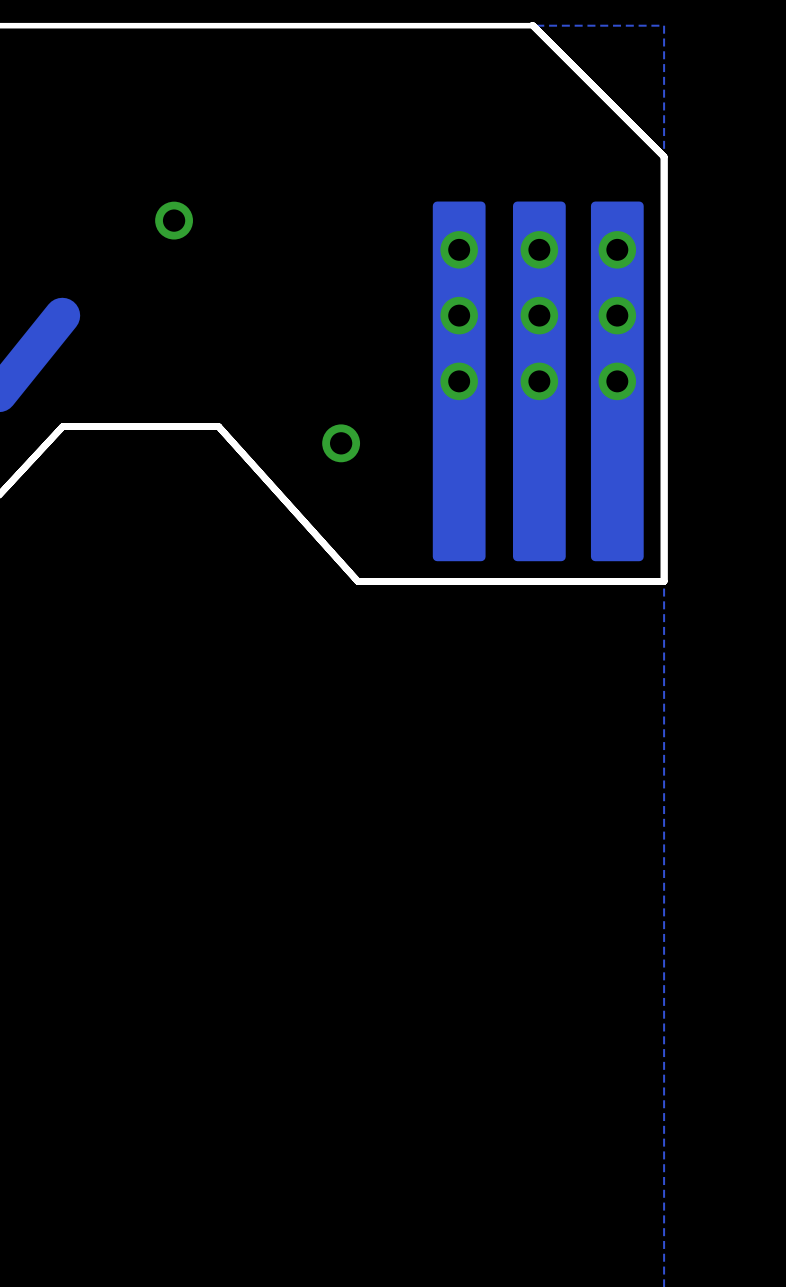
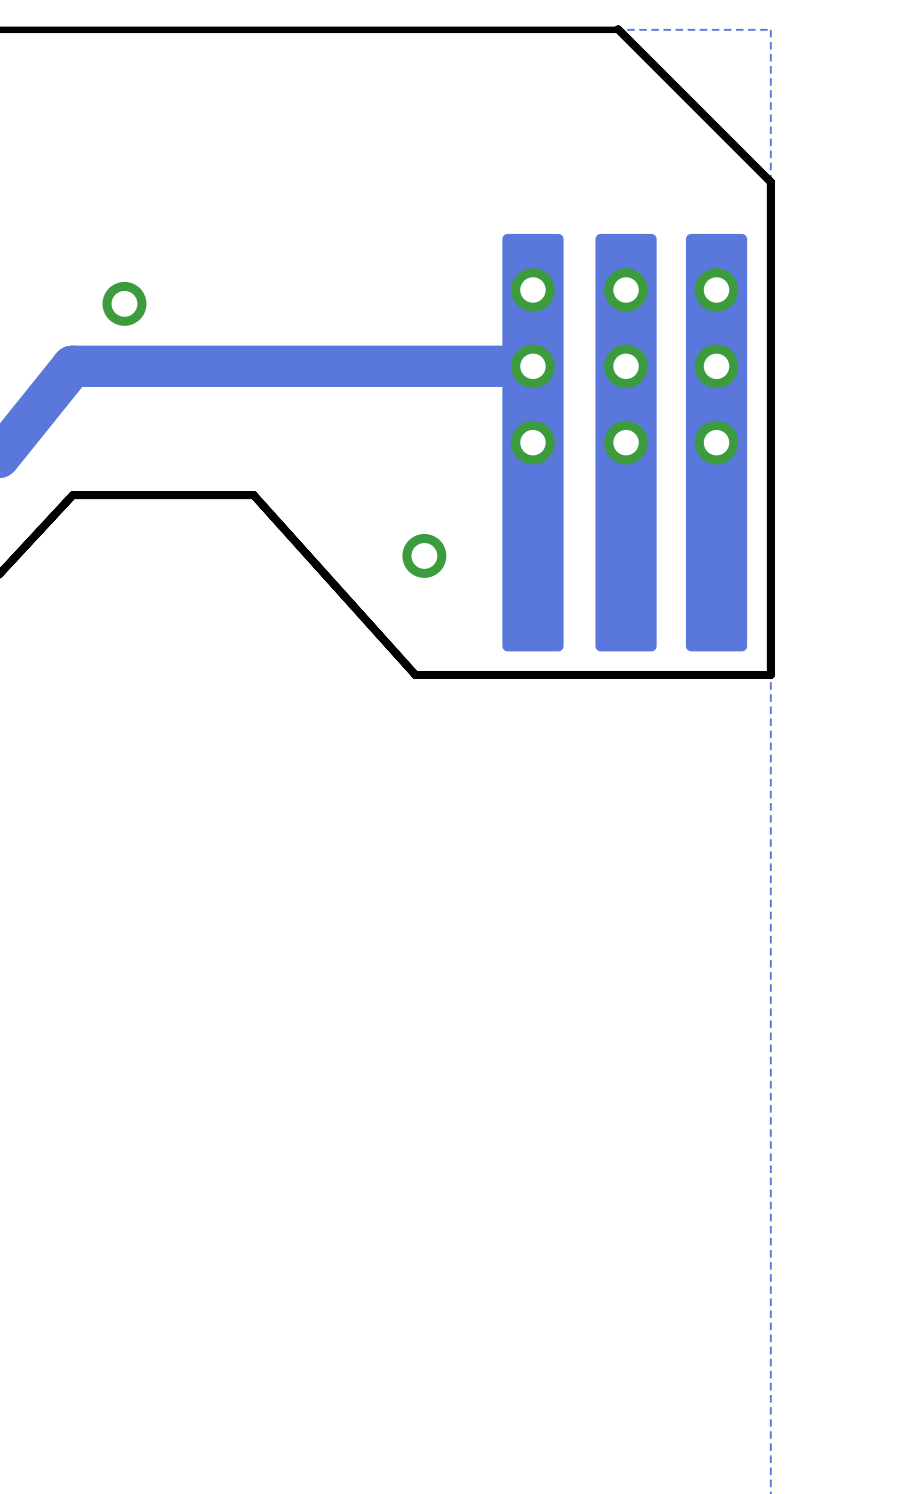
via position: (174, 220) -> (124, 303)
track: none -> (532, 366) (72, 366)
via position: (341, 443) -> (424, 555)

